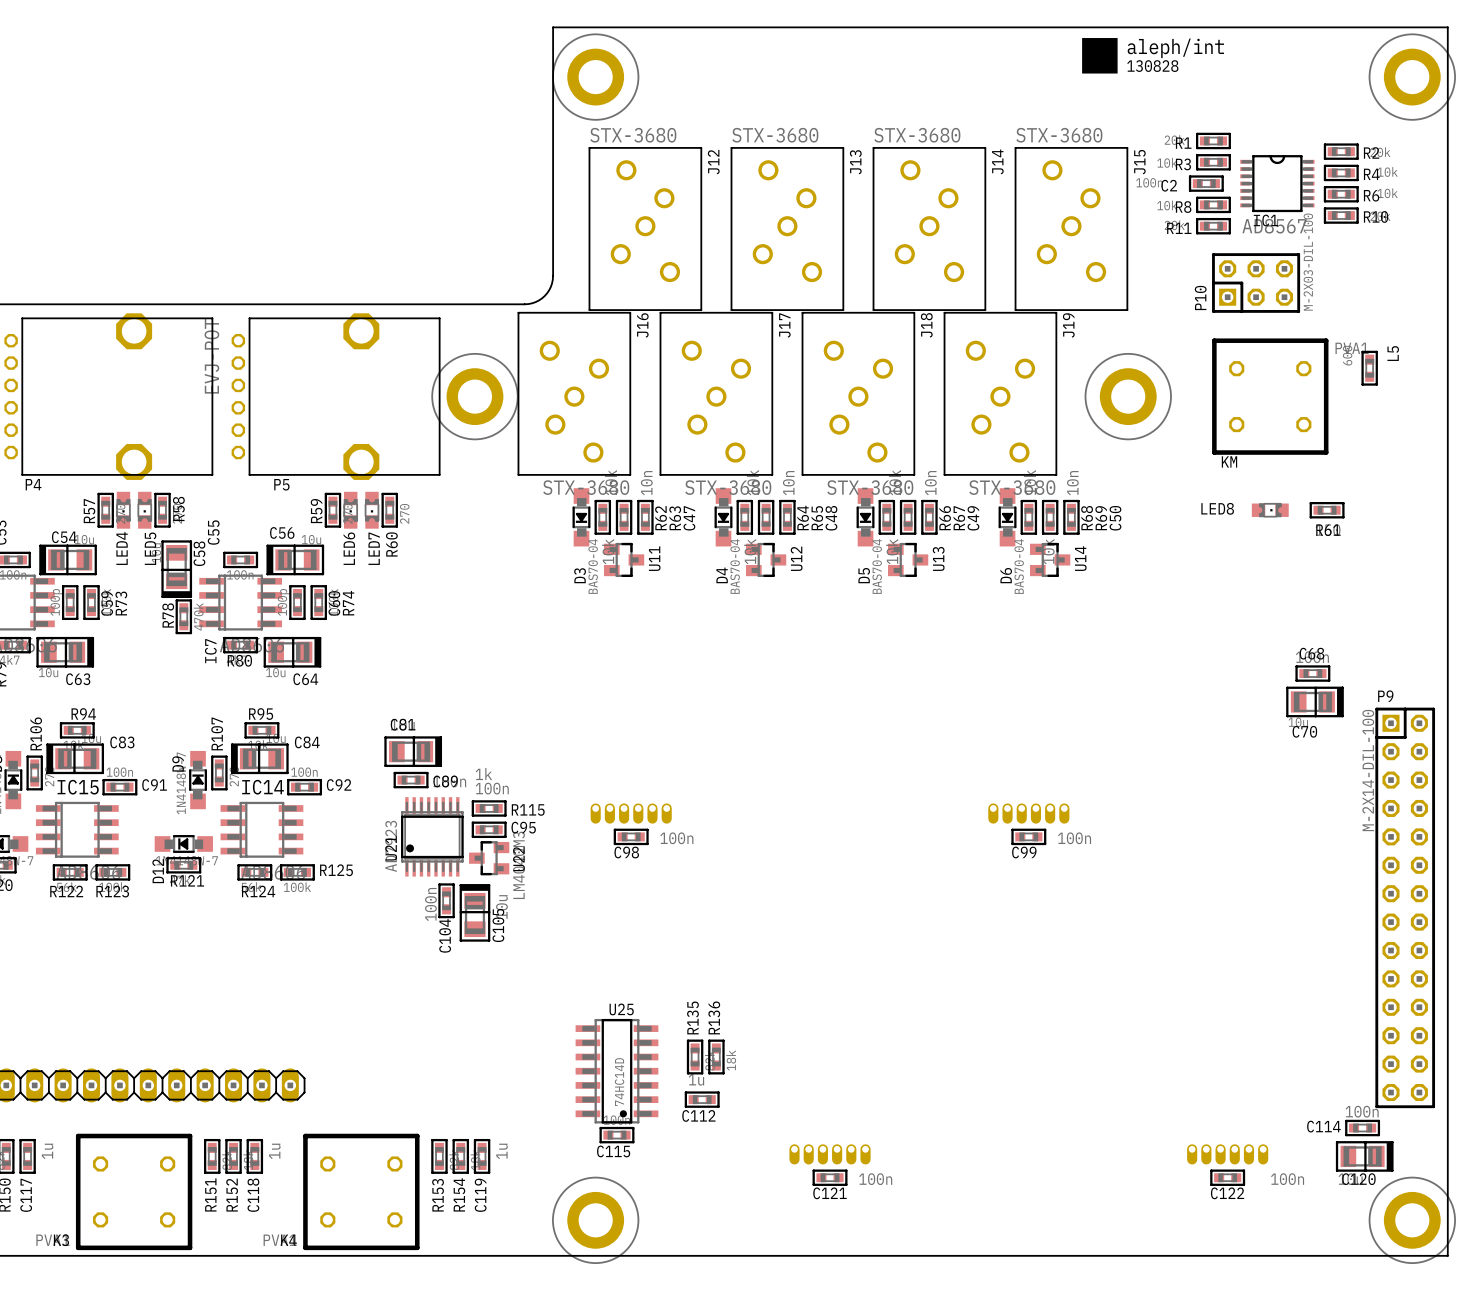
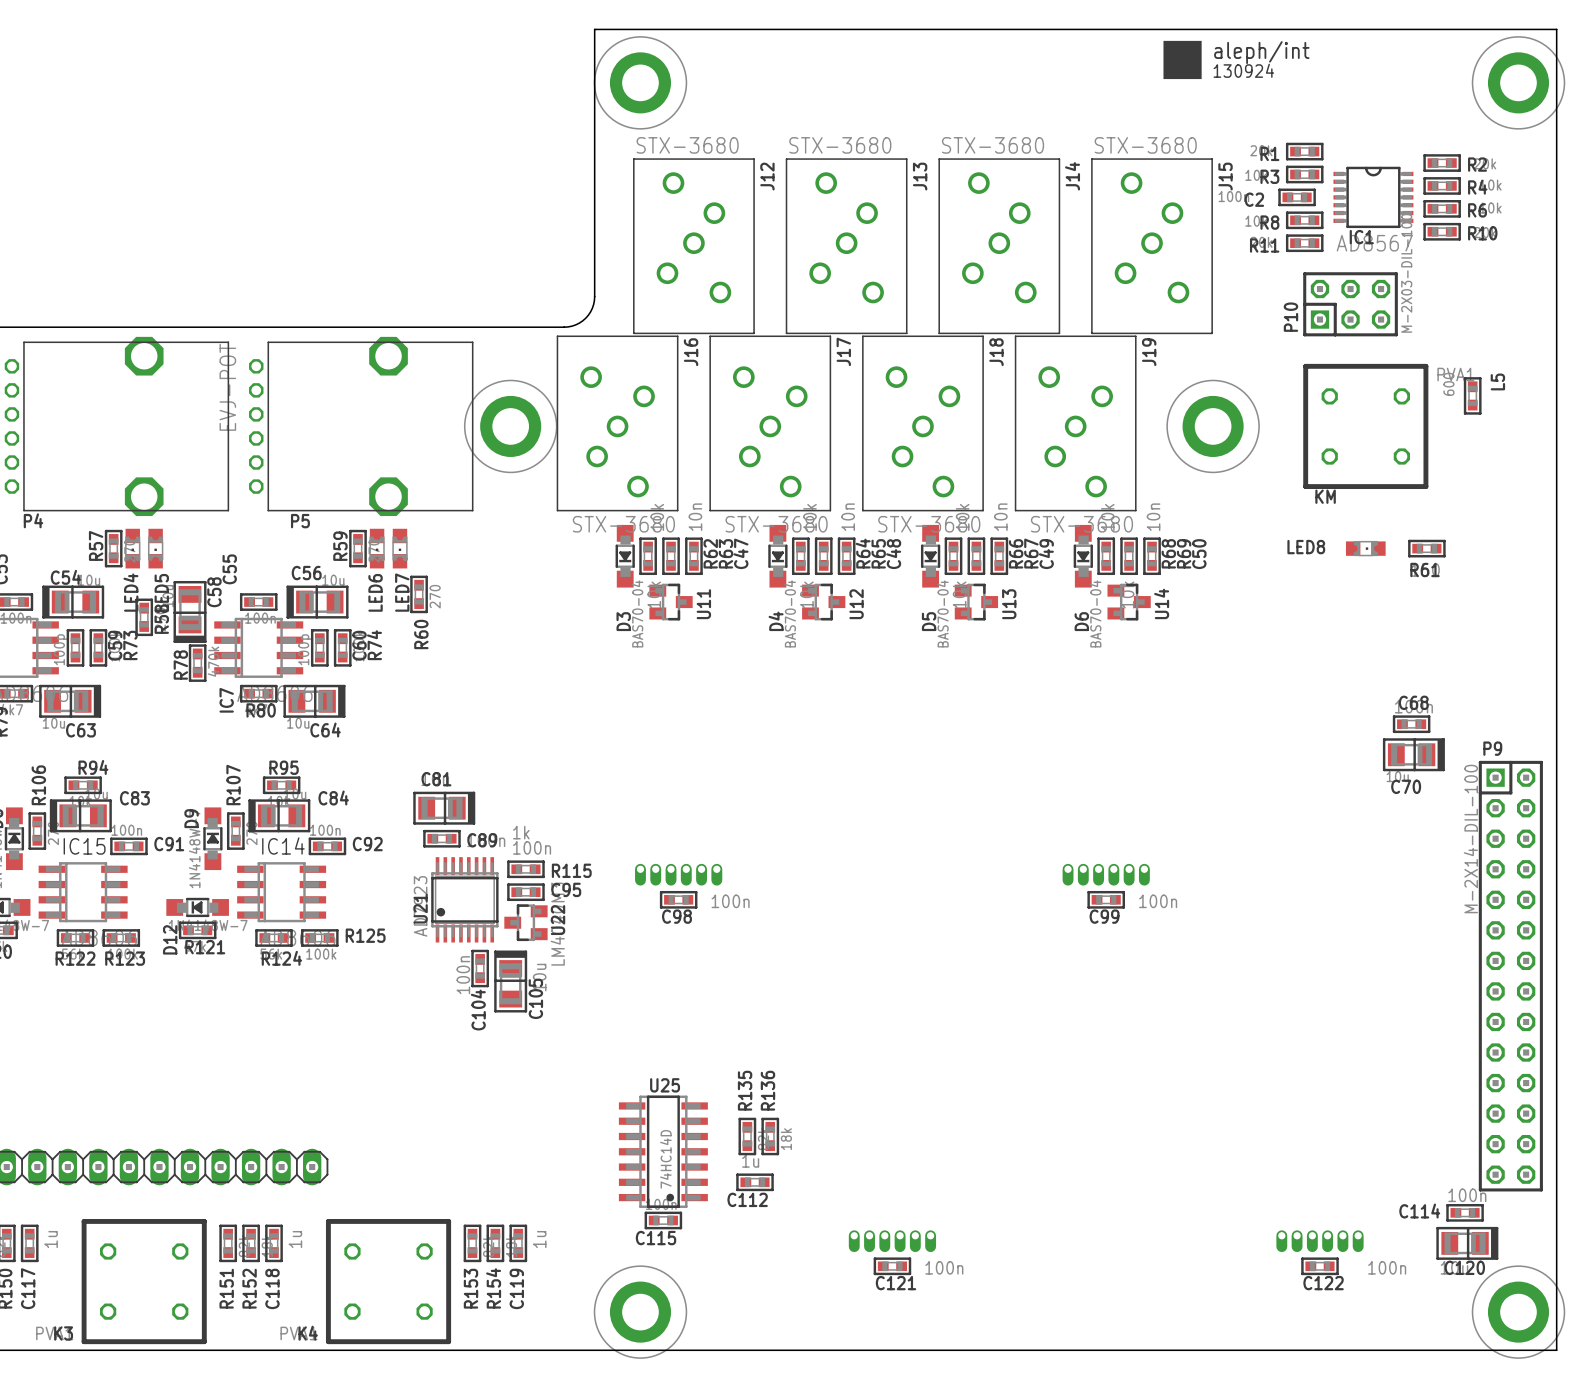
text: 130828 (1152, 66) -> 130924 (1243, 70)
R58 position: (162, 510) -> (144, 617)
R60 position: (389, 510) -> (419, 594)

